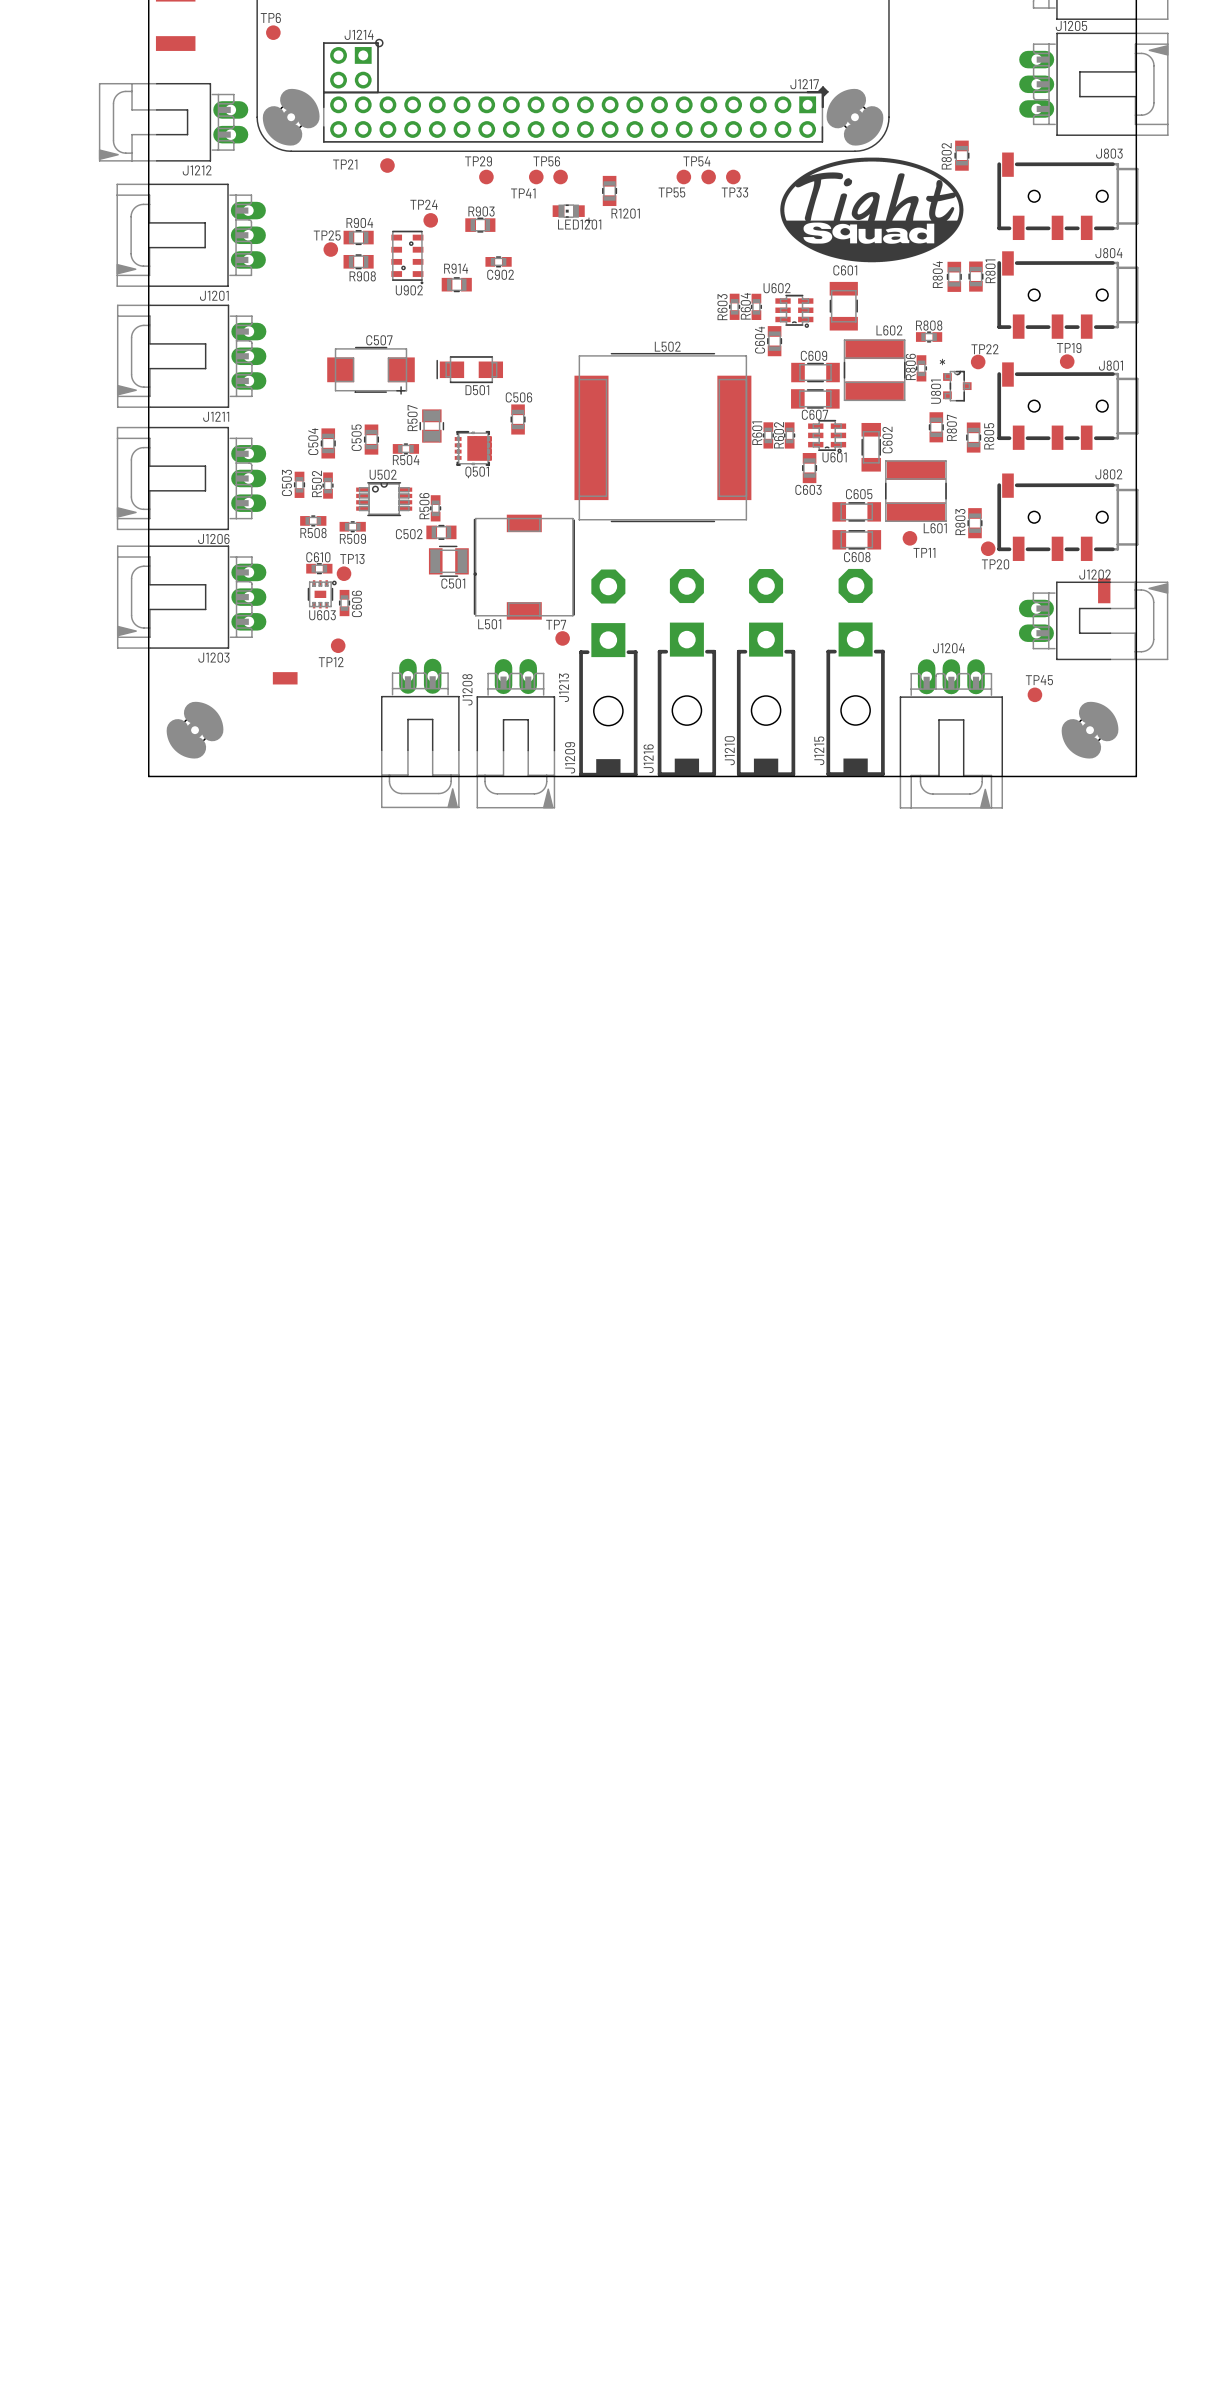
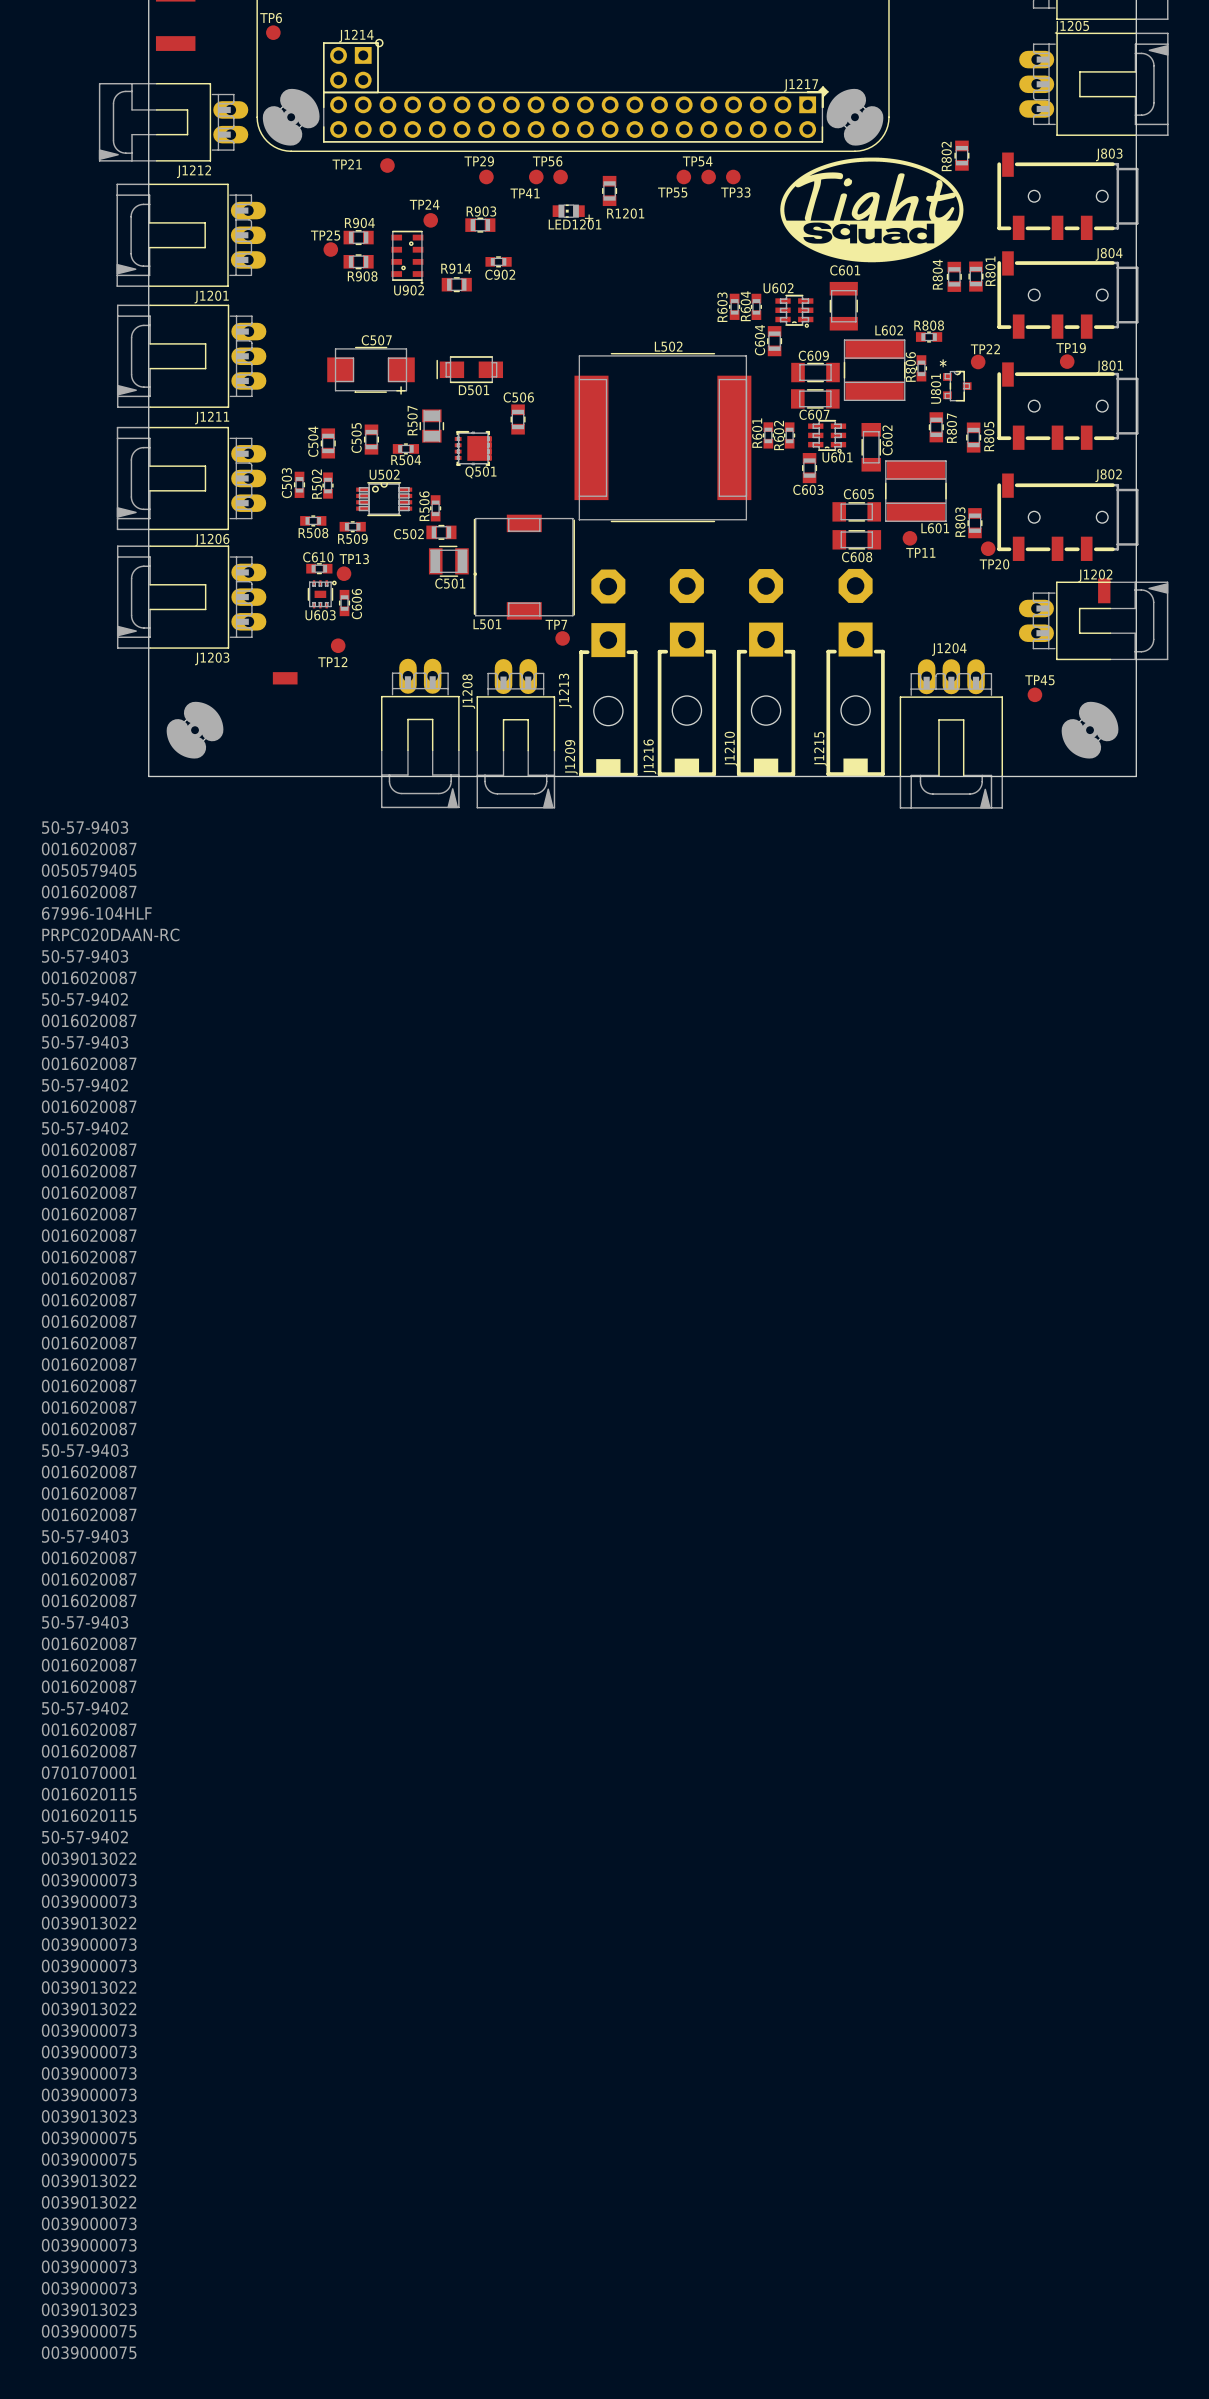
drawing: none -> [41, 821, 180, 2360]

